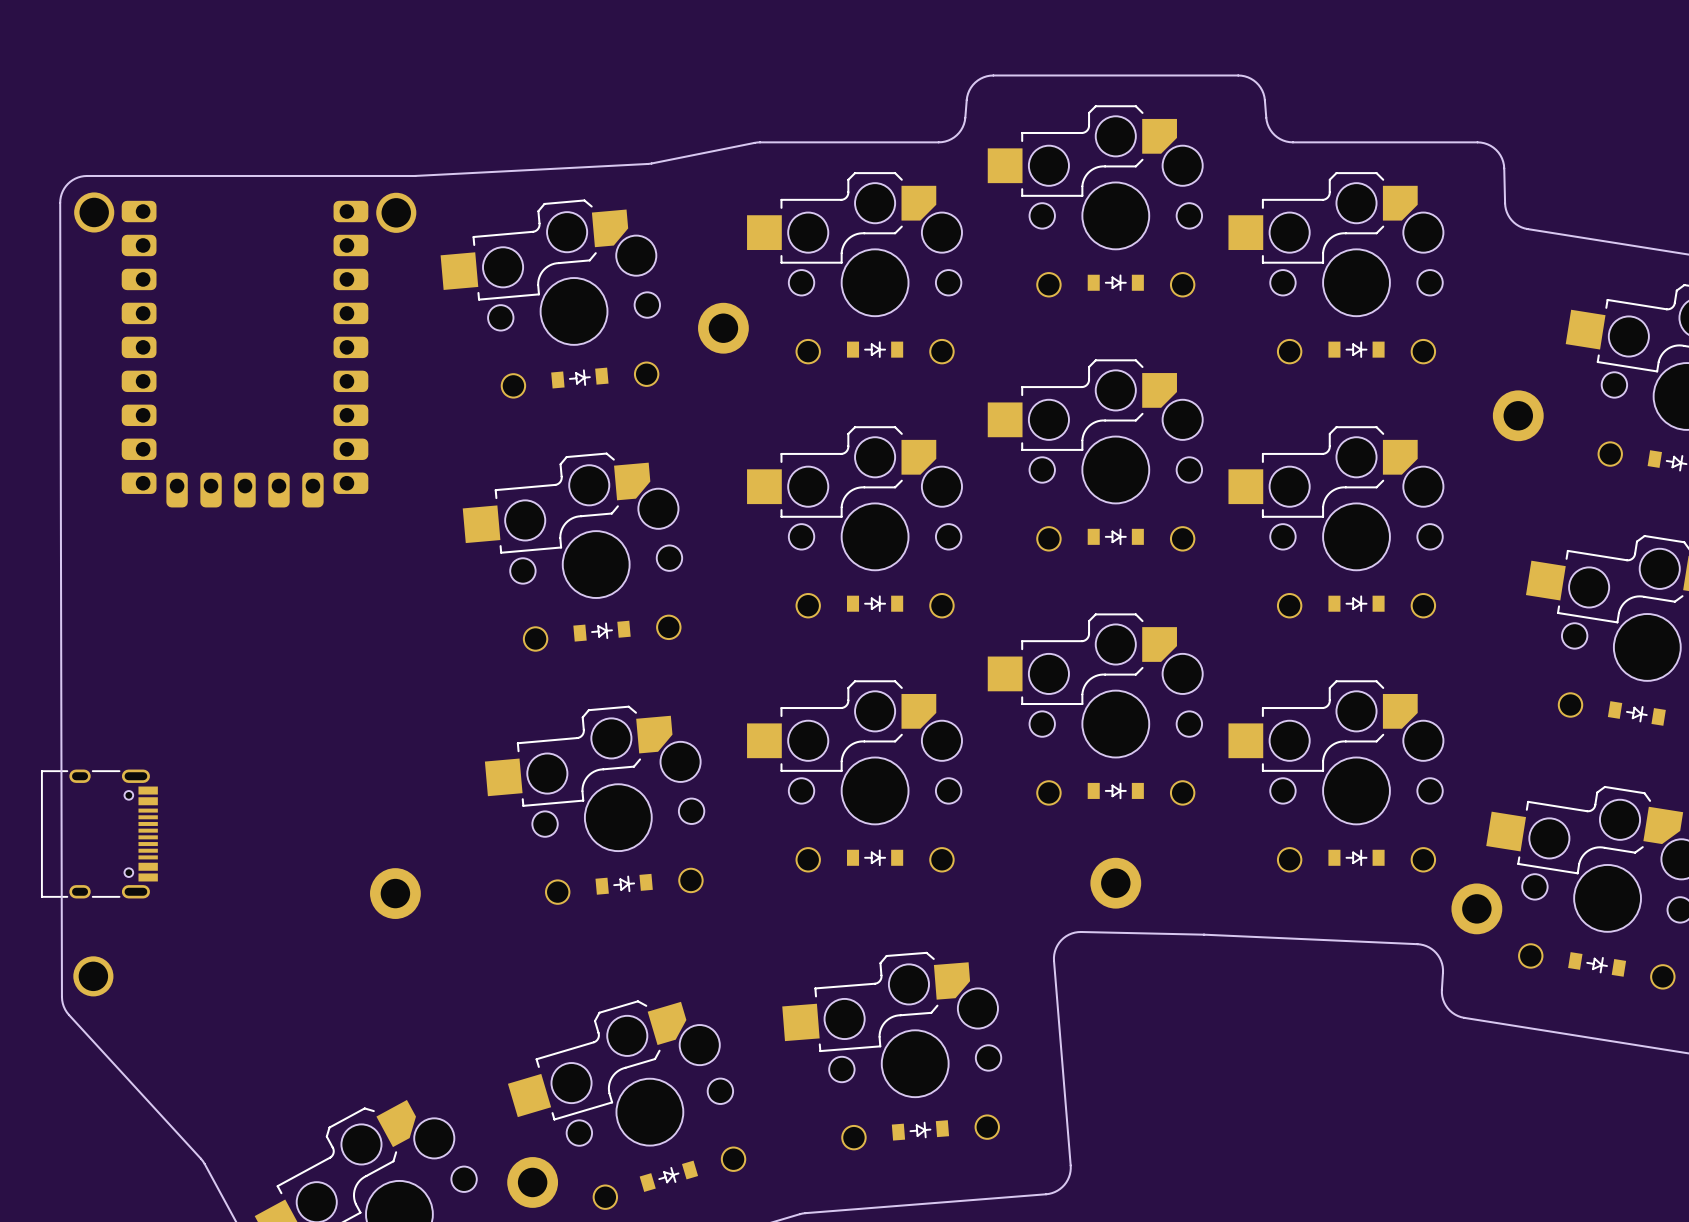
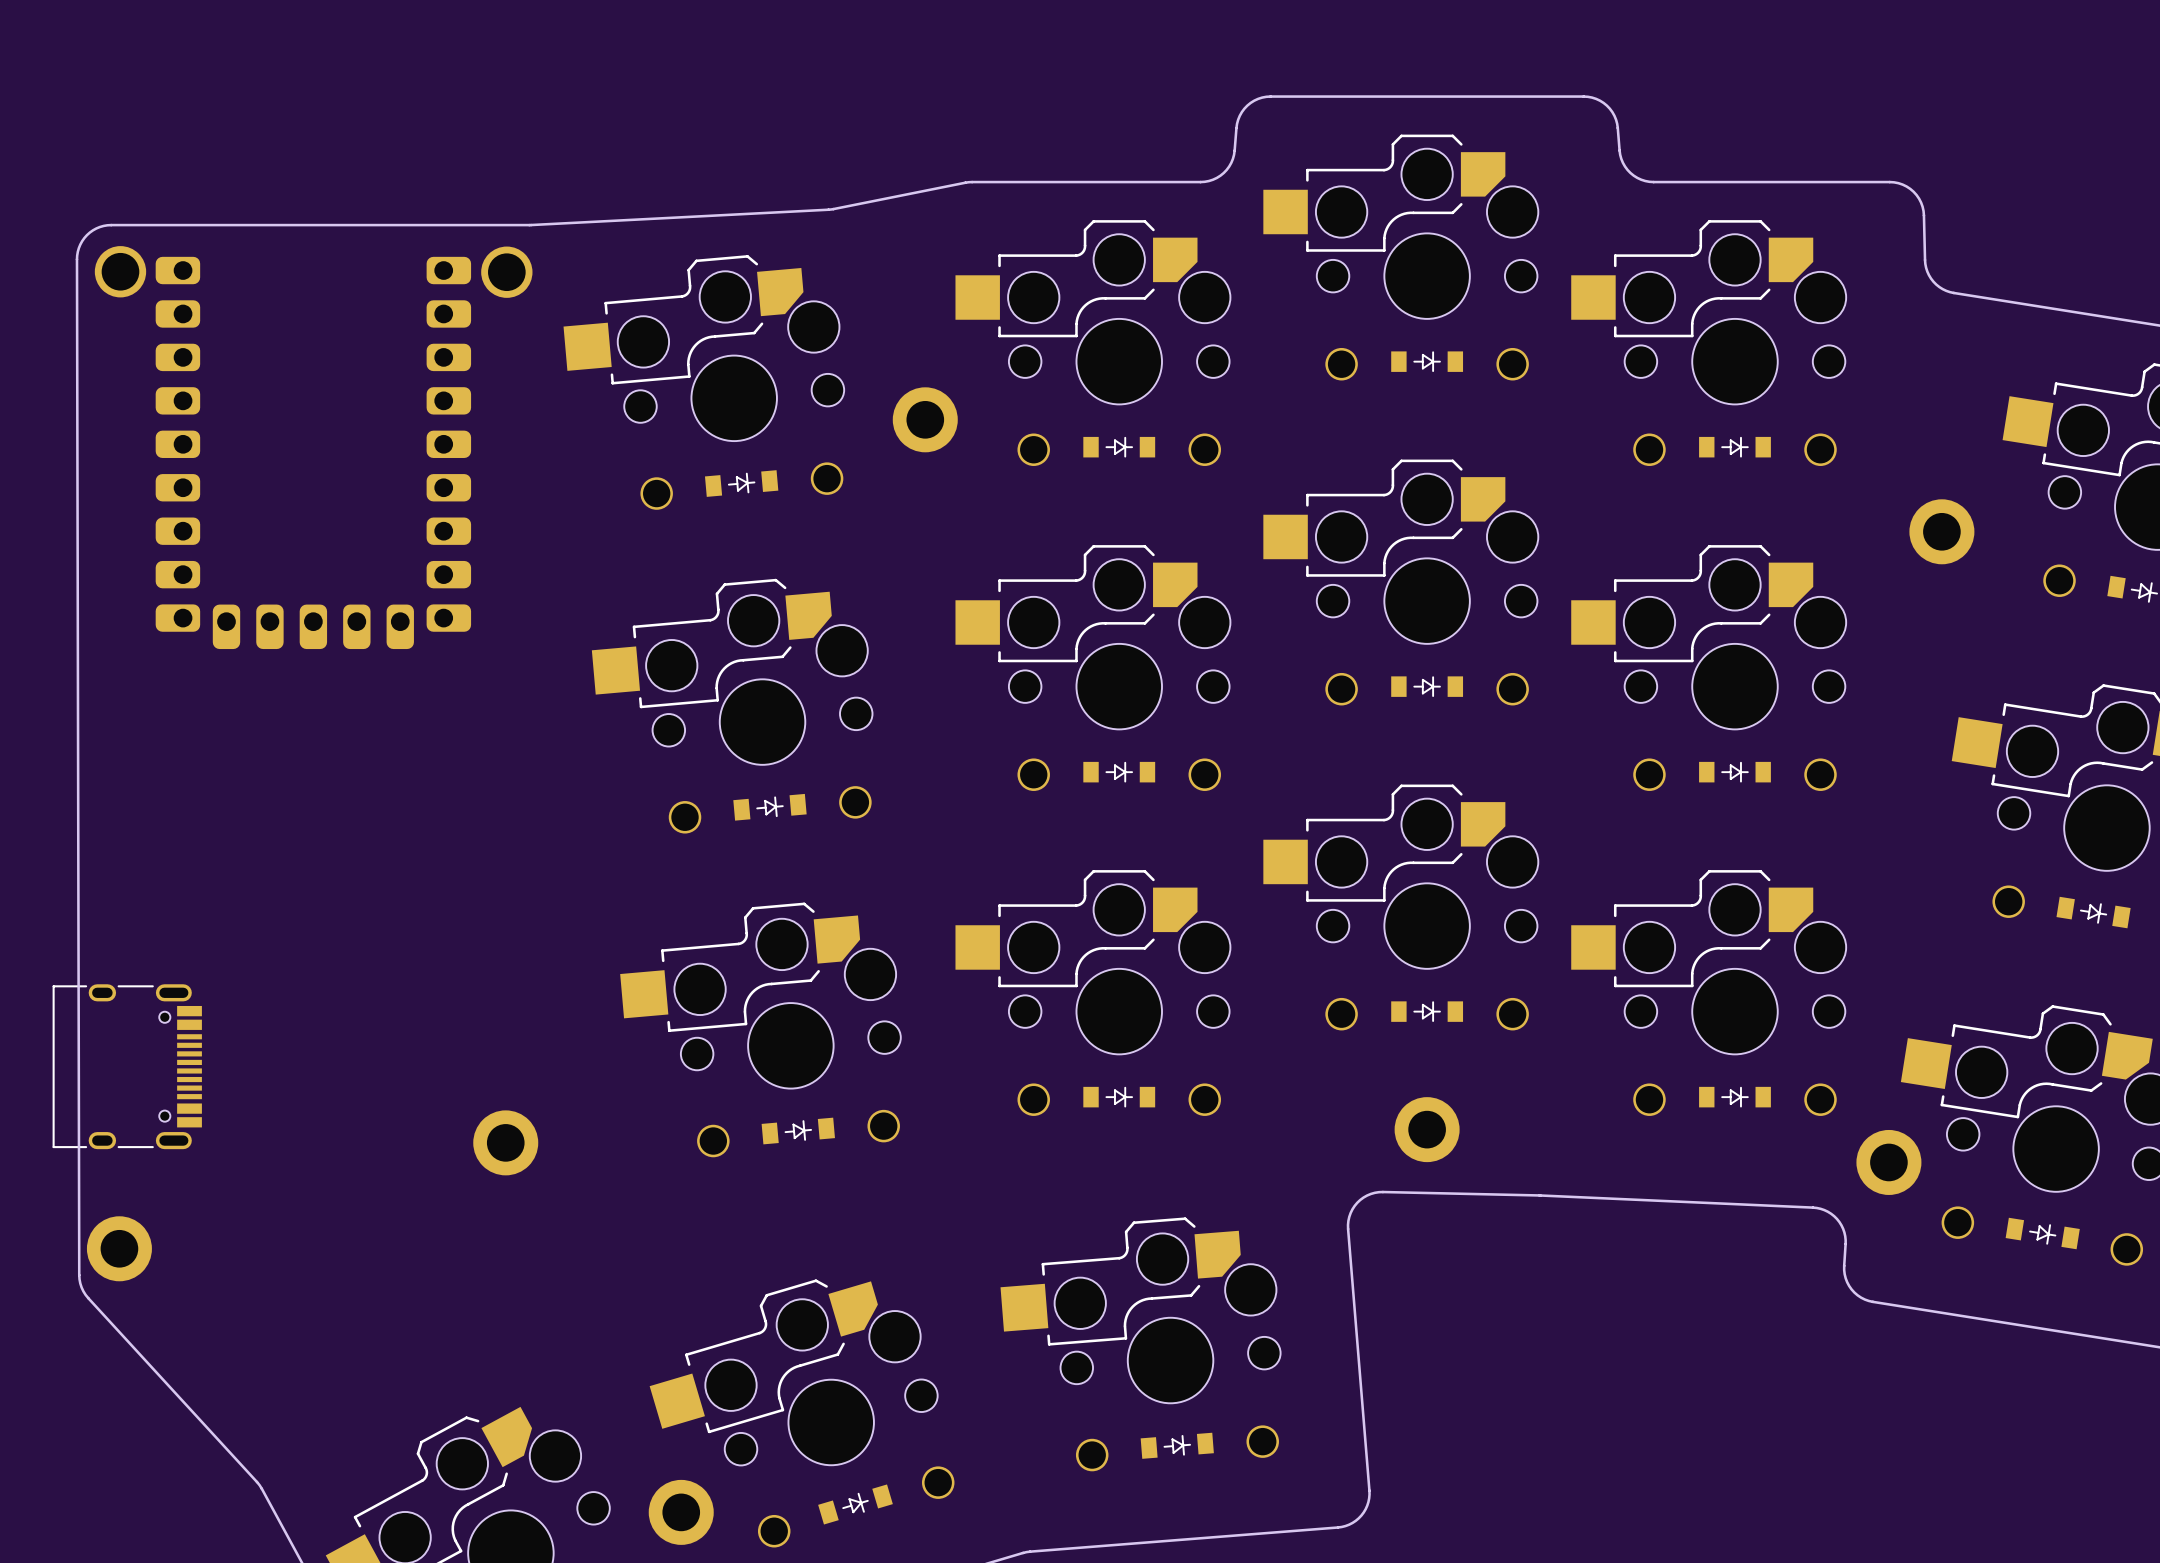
part footprint: [73, 956, 114, 997] -> [86, 1216, 152, 1282]

